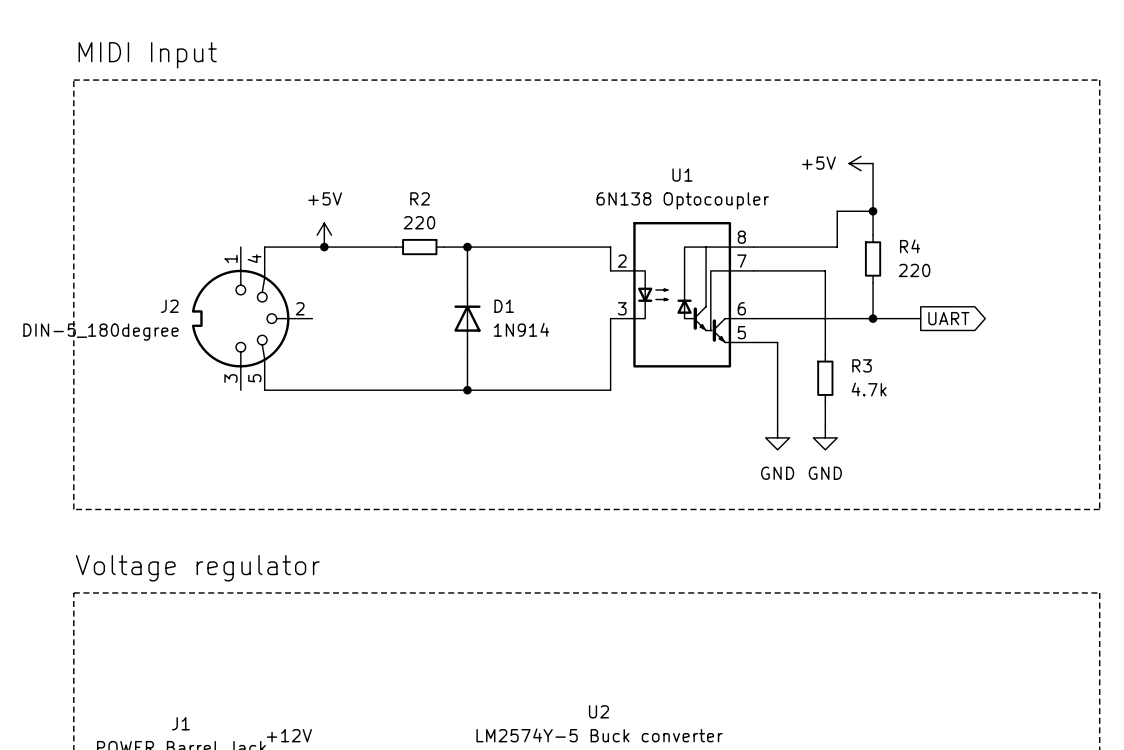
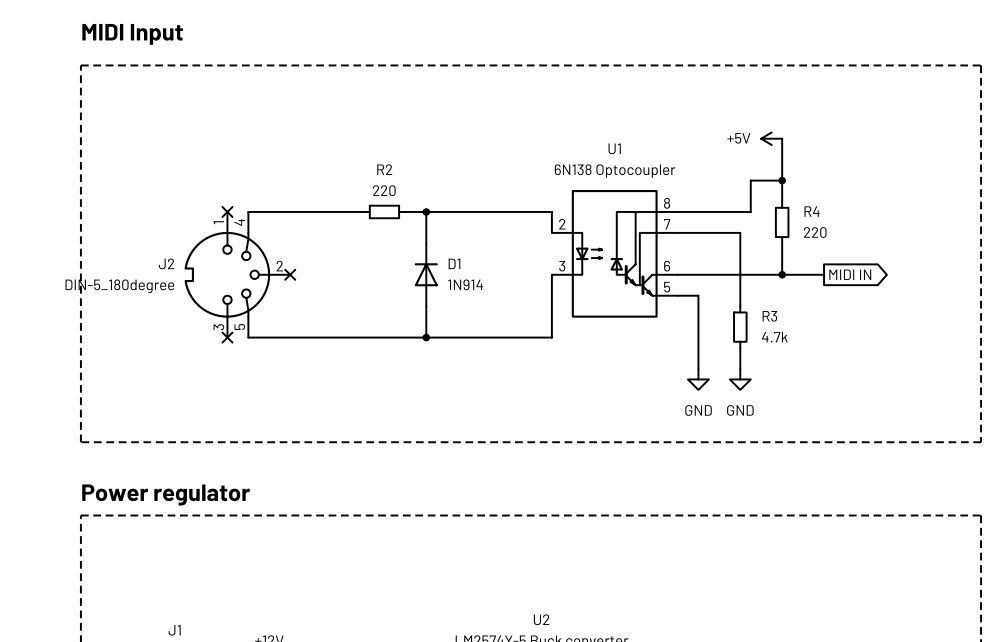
text: none -> MIDI Input (132, 34)
label: MIDI Input (147, 55) -> none
power symbol: +5V (324, 235) -> none
no-connect mark: none -> (227, 211)
junction: (324, 247) -> none
no-connect mark: none -> (290, 274)
global label: UART (948, 318) -> MIDI IN (850, 274)
no-connect mark: none -> (227, 337)
label: Voltage regulator (197, 568) -> none
text: none -> Power regulator (166, 495)

